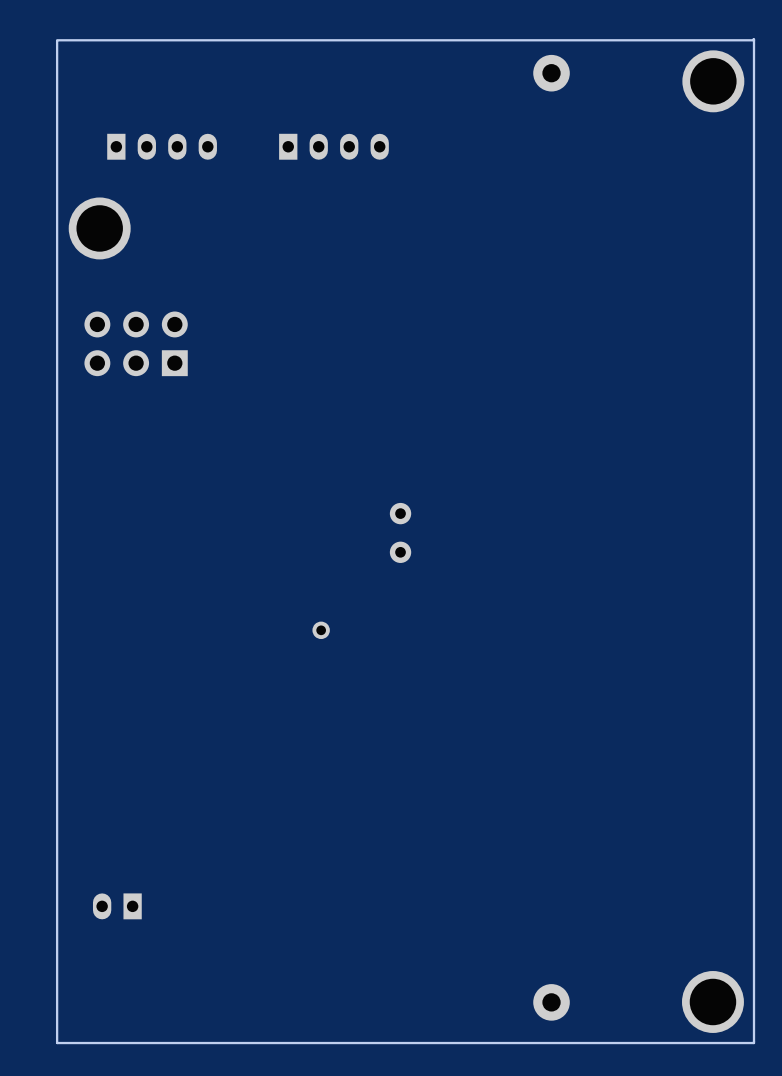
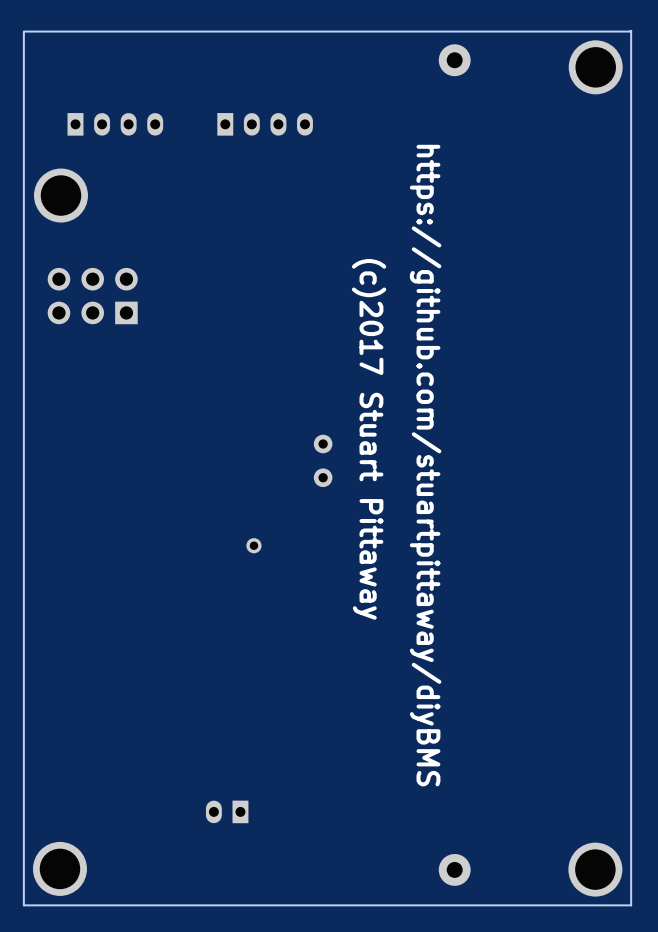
text: none -> (c)2017 Stuart Pittaway (369, 439)
text: none -> https://github.com/stuartpittaway/diyBMS (425, 465)
part position: (117, 906) -> (227, 811)
part: none -> (59, 868)

